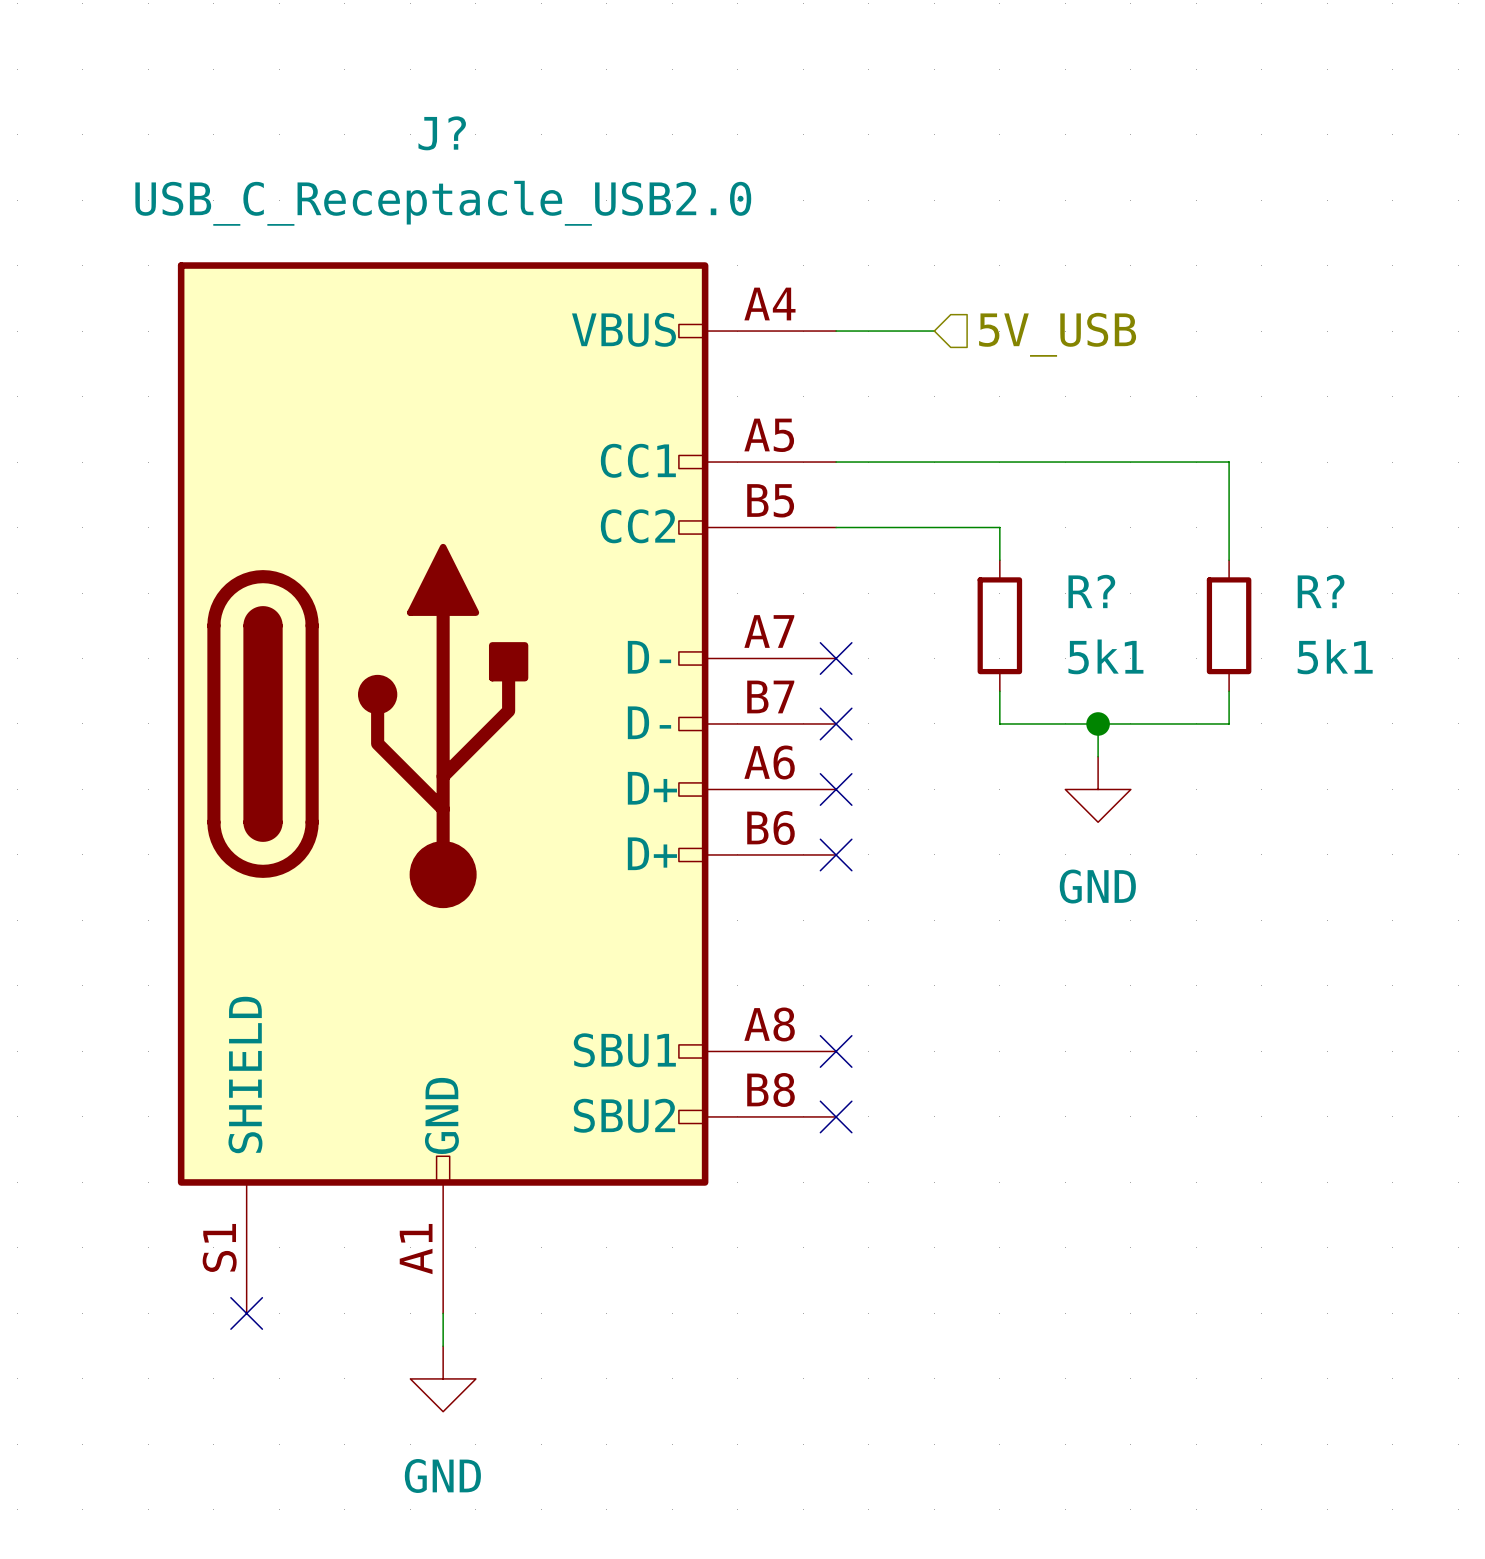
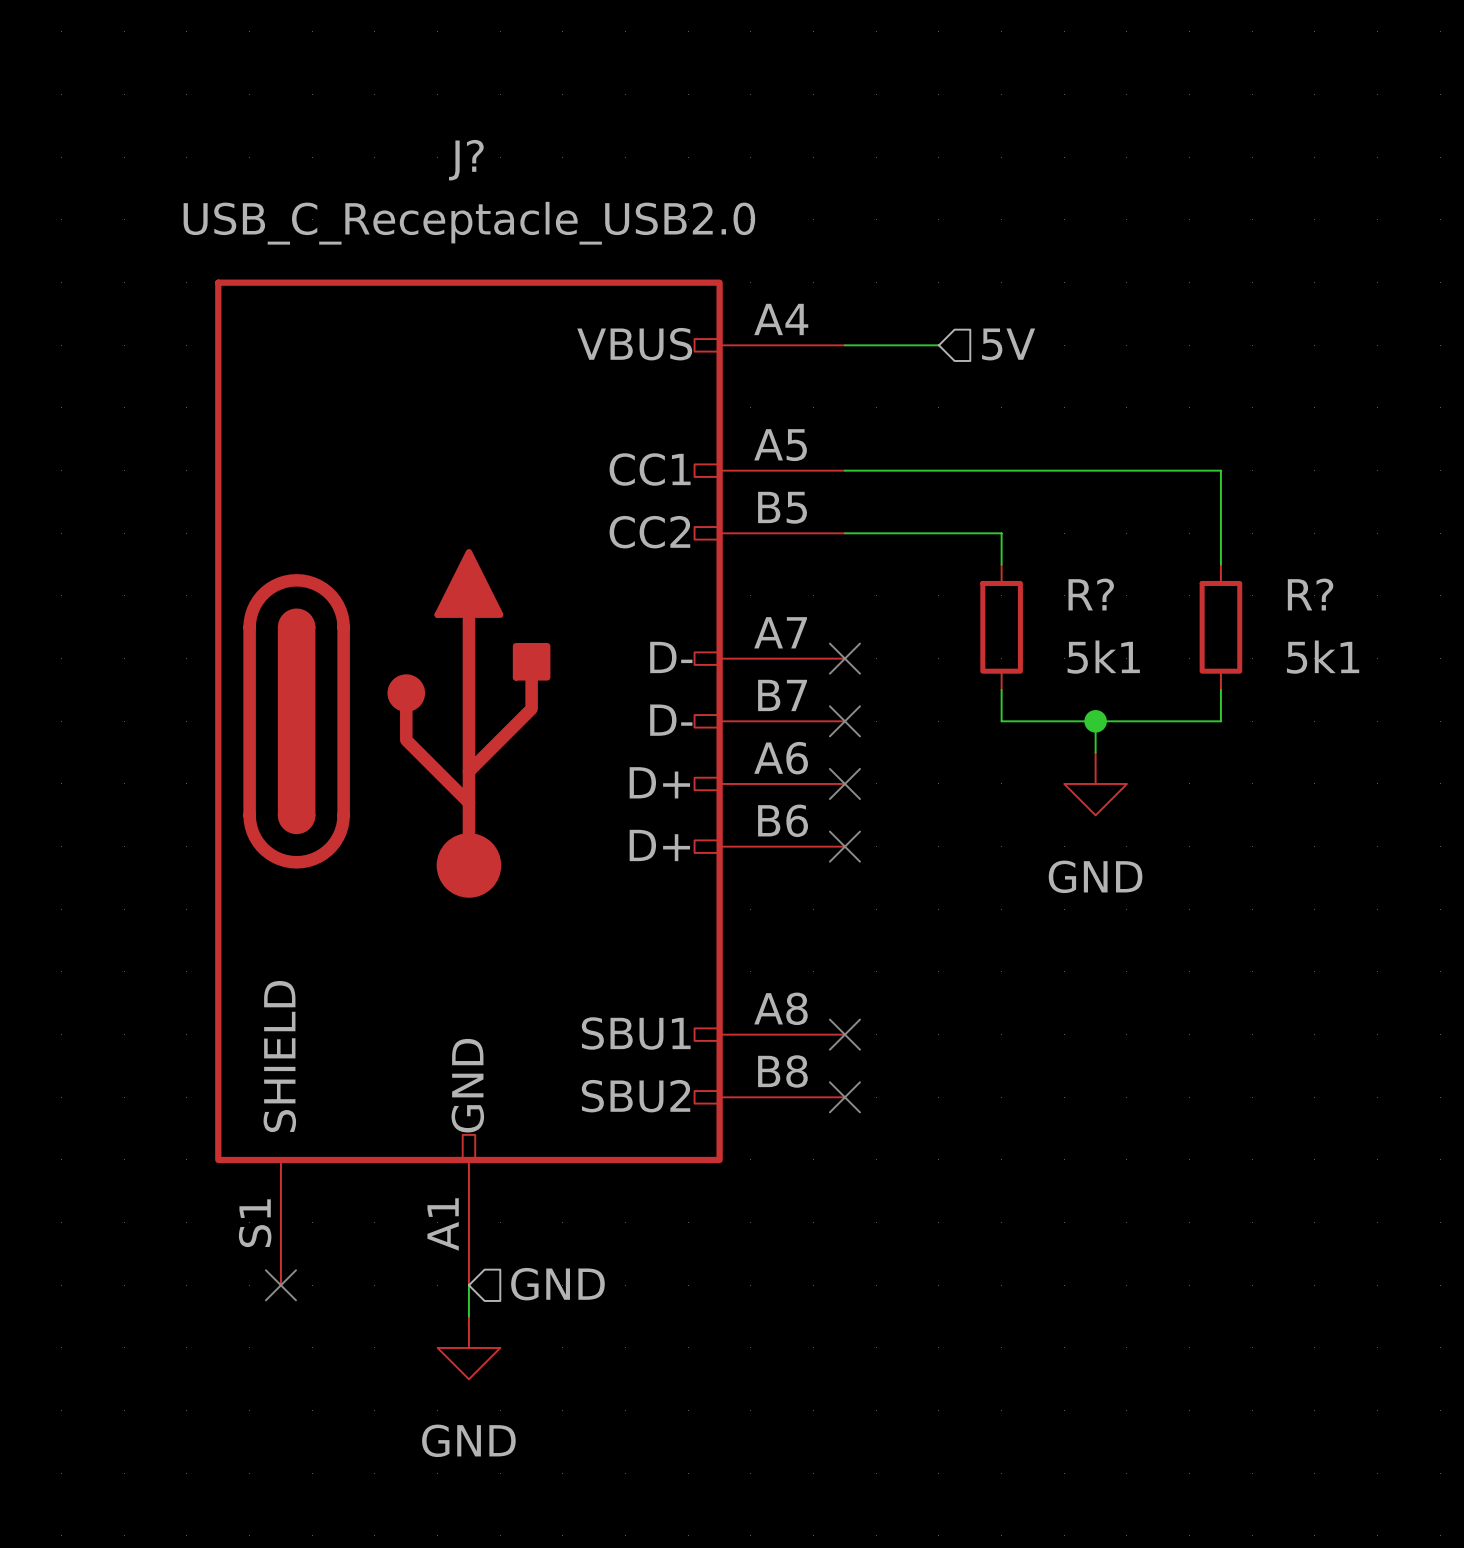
hierarchical label: 5V_USB (1057, 334) -> 5V (1008, 344)
hierarchical label: none -> GND (557, 1284)

